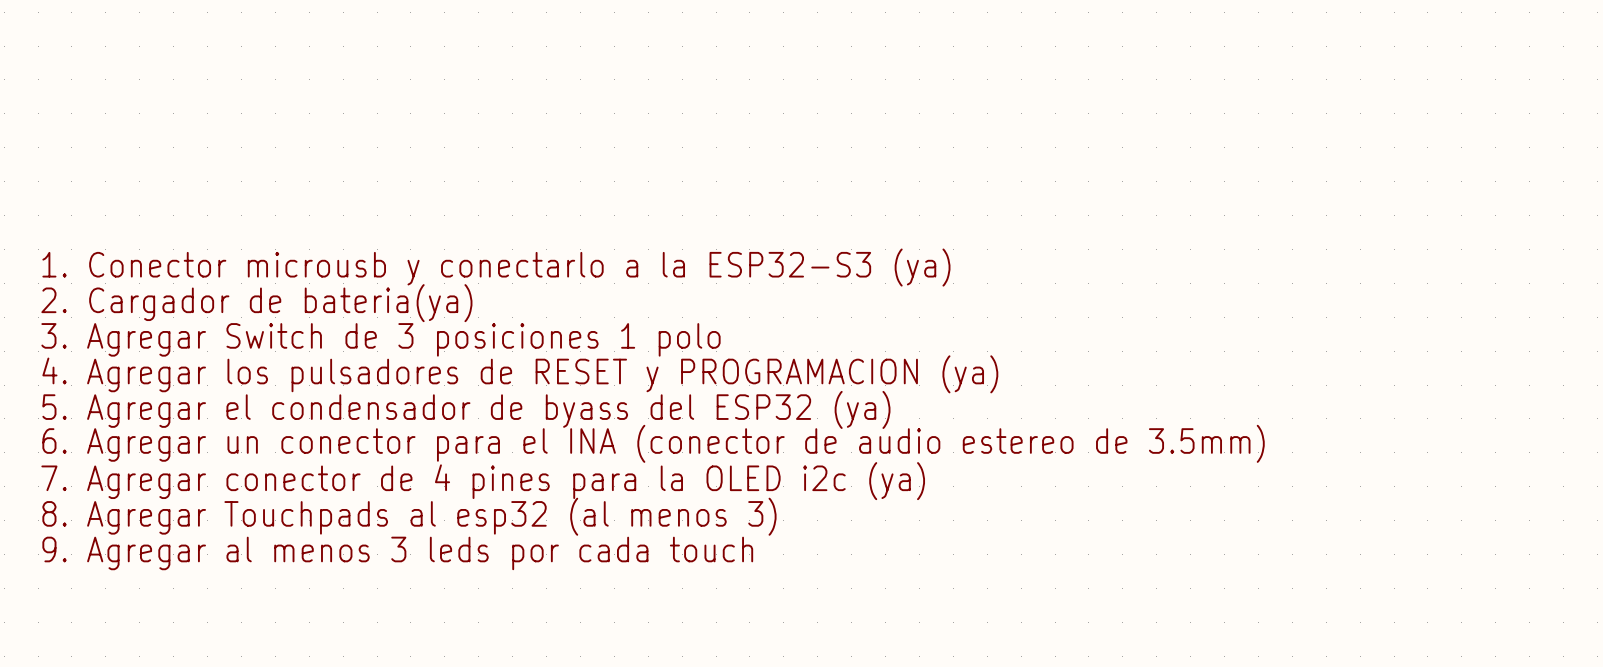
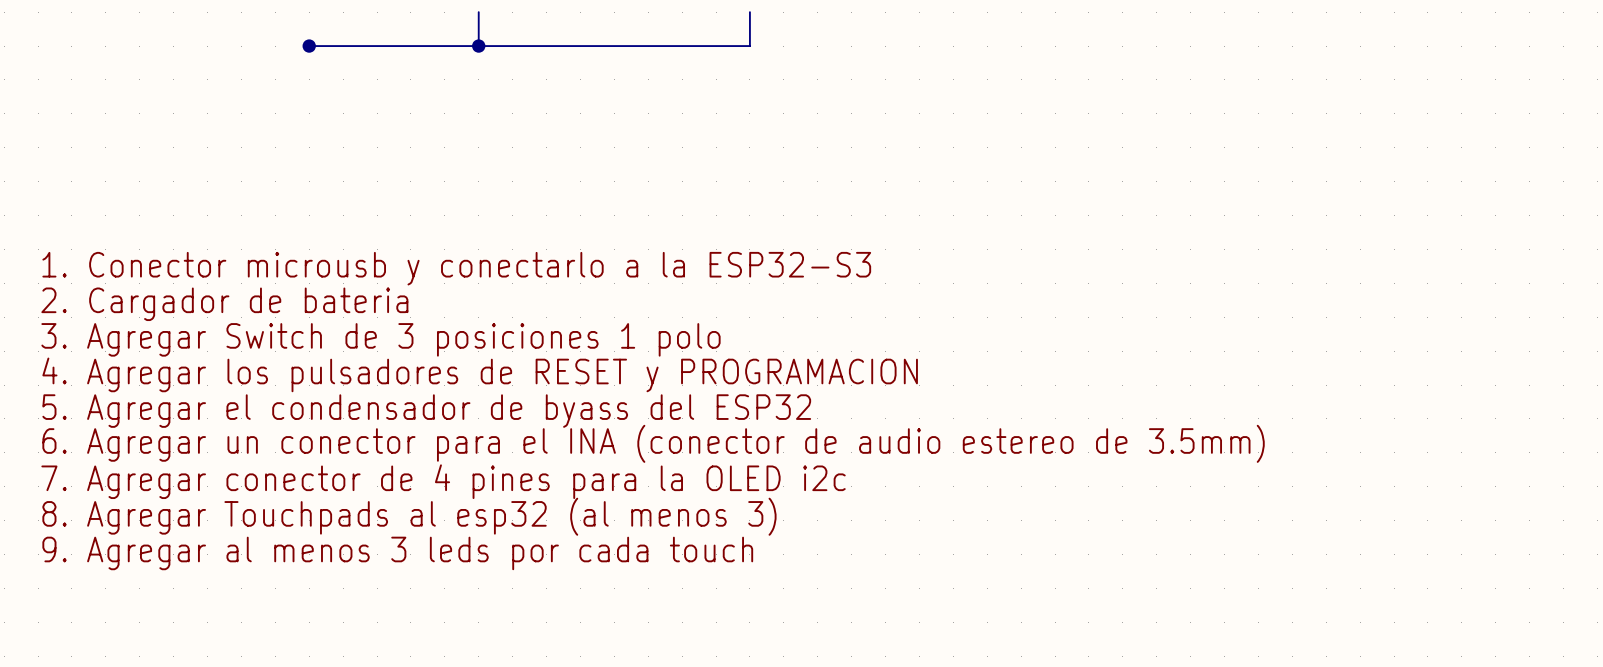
wire: none -> (478, 12) (478, 46)
wire: none -> (749, 12) (749, 46) (309, 46)
junction: none -> (309, 46)
junction: none -> (478, 46)
text: 1. Conector microusb y conectarlo a la ESP32-S3 (ya) (496, 267) -> 1. Conector microusb y conectarlo a la ESP32-S3 (456, 268)
text: 2. Cargador de bateria(ya) (256, 303) -> 2. Cargador de bateria (224, 304)
text: 4. Agregar los pulsadores de RESET y PROGRAMACION (ya) (520, 374) -> 4. Agregar los pulsadores de RESET y PROGRAMACION (480, 374)
text: 5. Agregar el condensador de byass del ESP32 (ya) (466, 409) -> 5. Agregar el condensador de byass del ESP32 (426, 411)
text: 7. Agregar conector de 4 pines para la OLED i2c (ya) (483, 481) -> 7. Agregar conector de 4 pines para la OLED i2c (443, 481)

